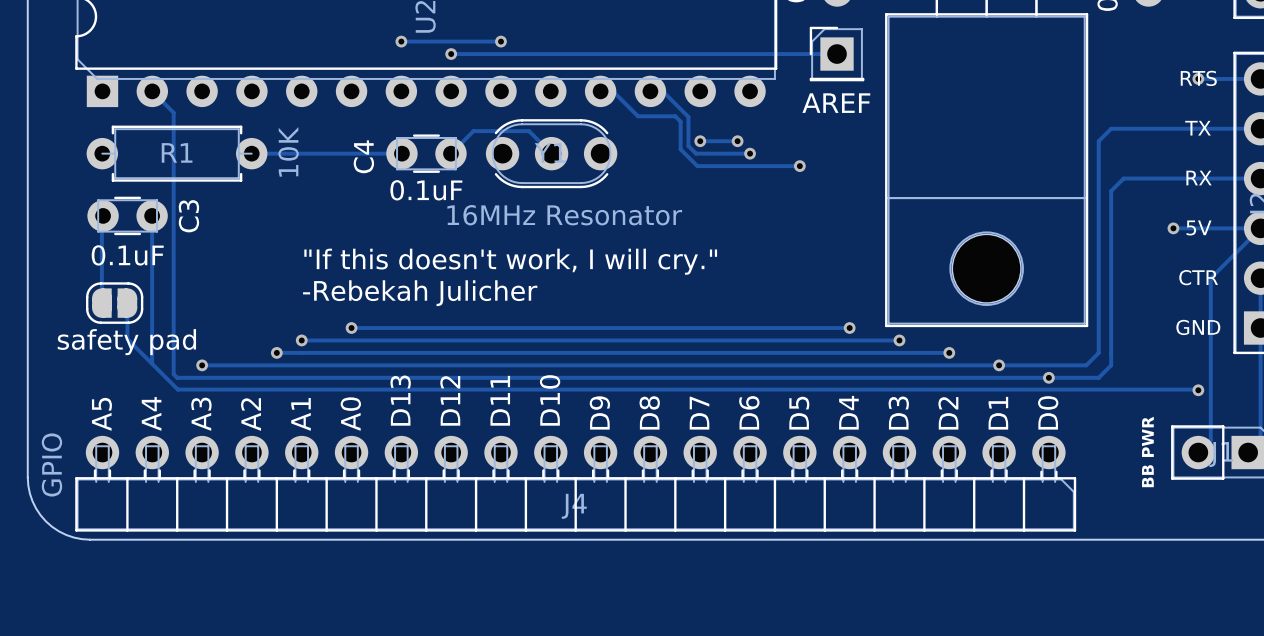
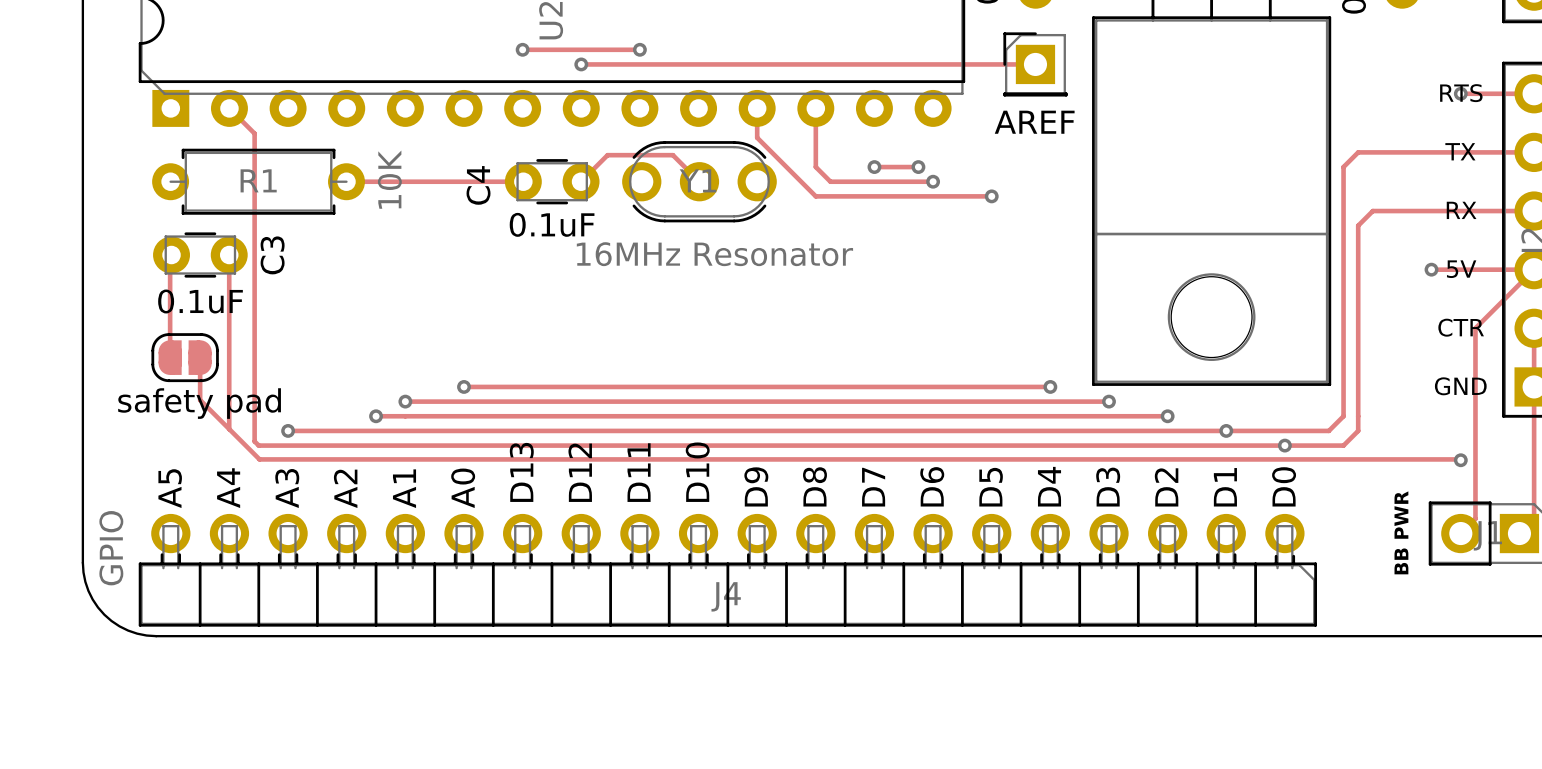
track: (600, 91) (613, 91) (637, 116) (675, 116) (680, 121) (680, 149) (697, 166) -> (757, 108) (757, 137) (815, 196) (871, 196)
track: (650, 91) (662, 91) (688, 116) (688, 146) (696, 153) -> (815, 108) (815, 167) (830, 181) (869, 181)
text: "If this doesn't work, I will cry." (510, 261) -> none
text: -Rebekah Julicher (420, 293) -> none

